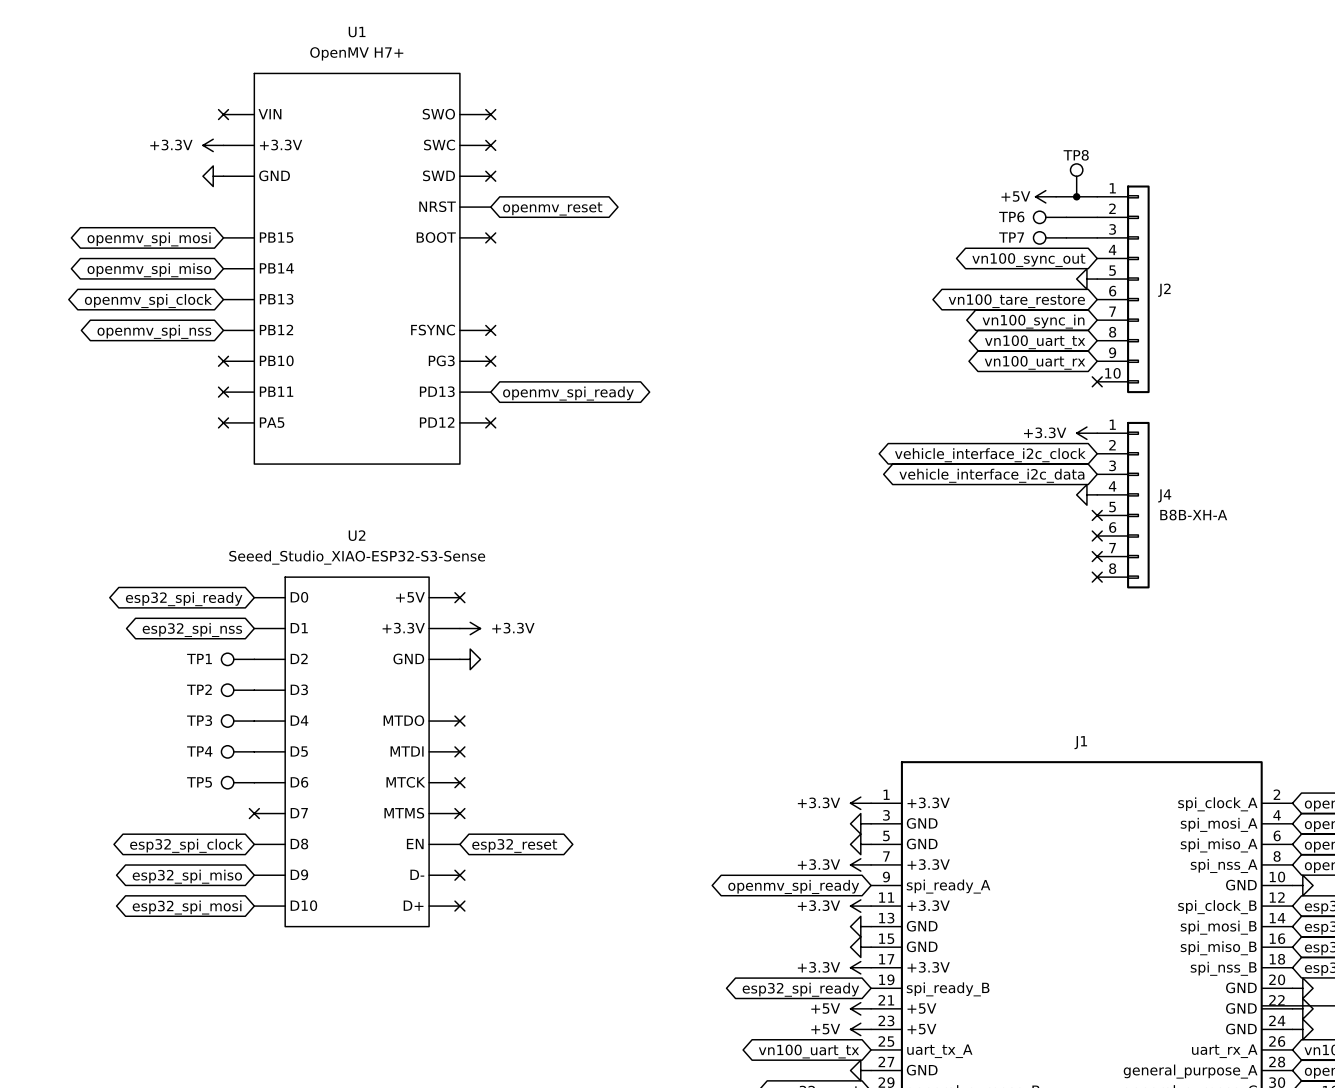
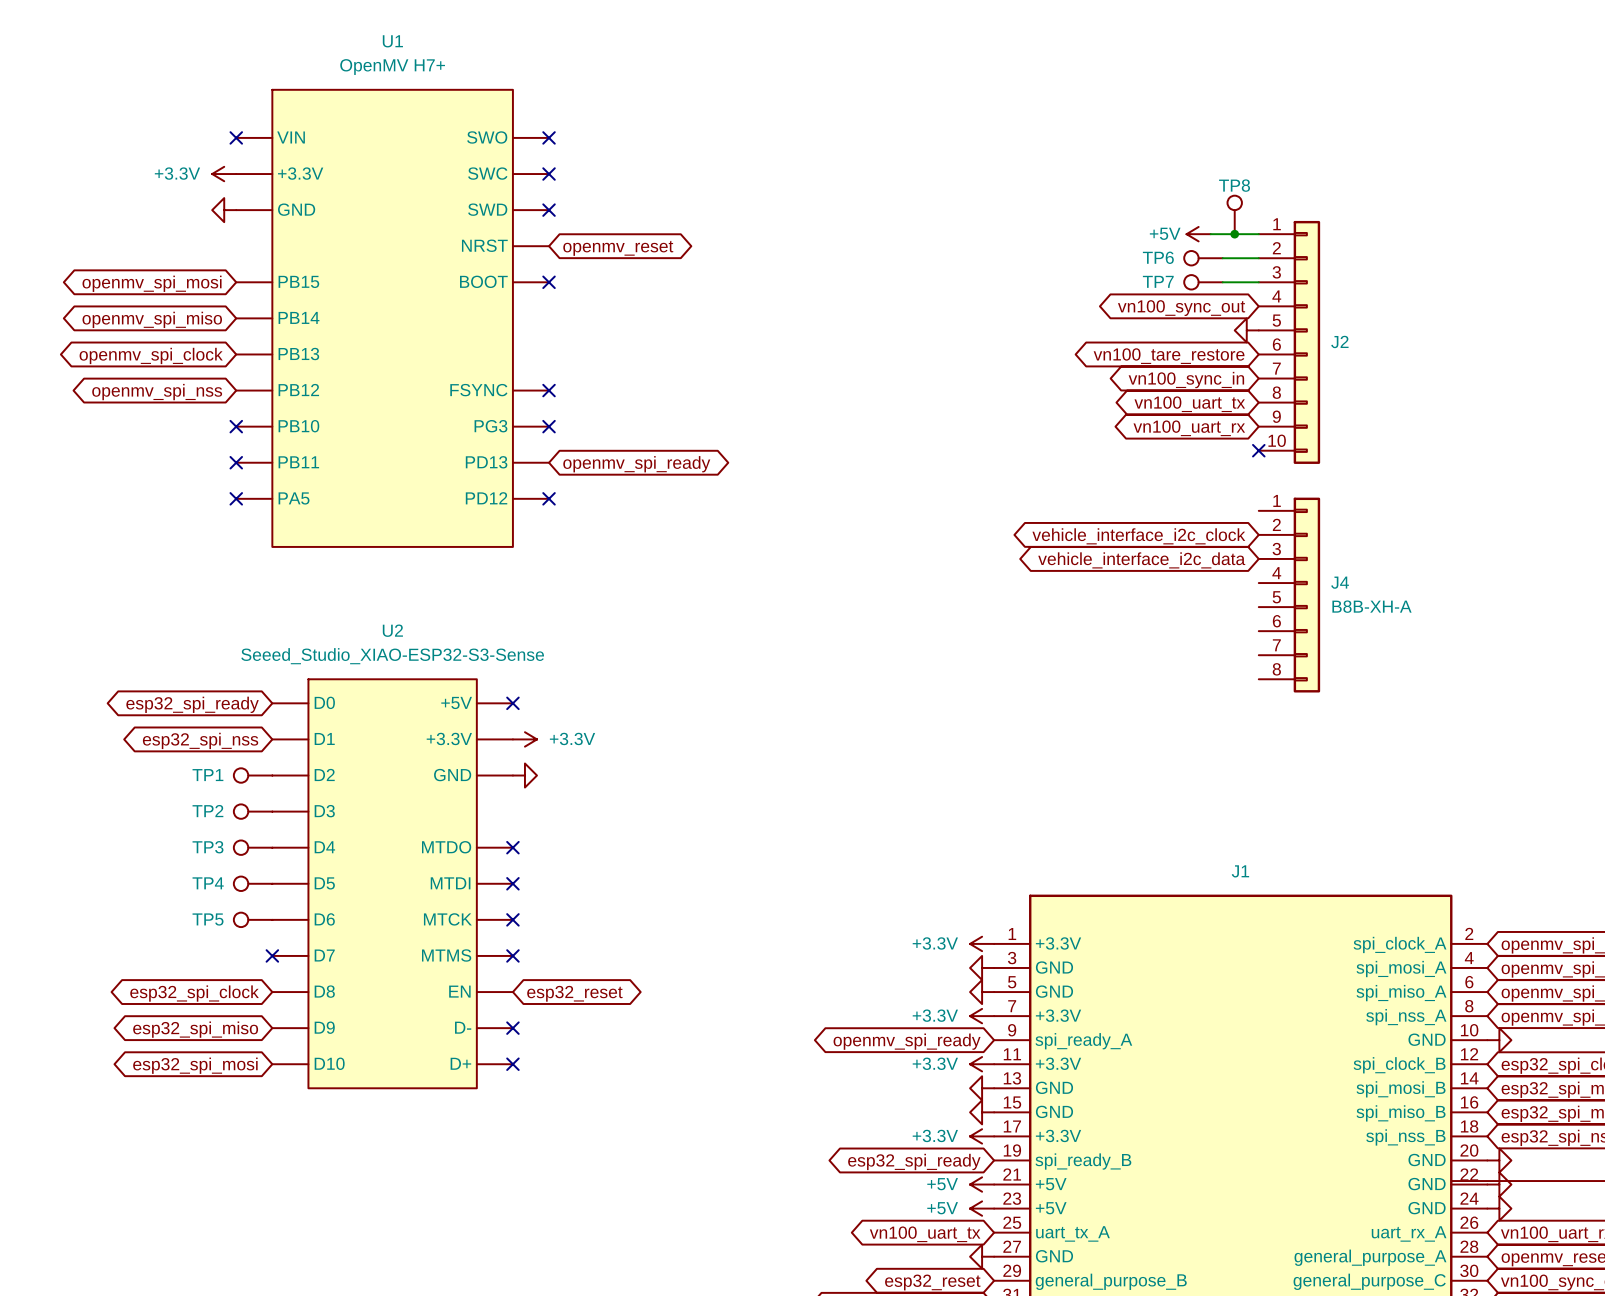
power symbol: +3.3V (1086, 433) -> none
power symbol: (1086, 494) -> none
no-connect mark: (1097, 515) -> none
no-connect mark: (1097, 536) -> none
no-connect mark: (1097, 556) -> none
no-connect mark: (1097, 577) -> none

